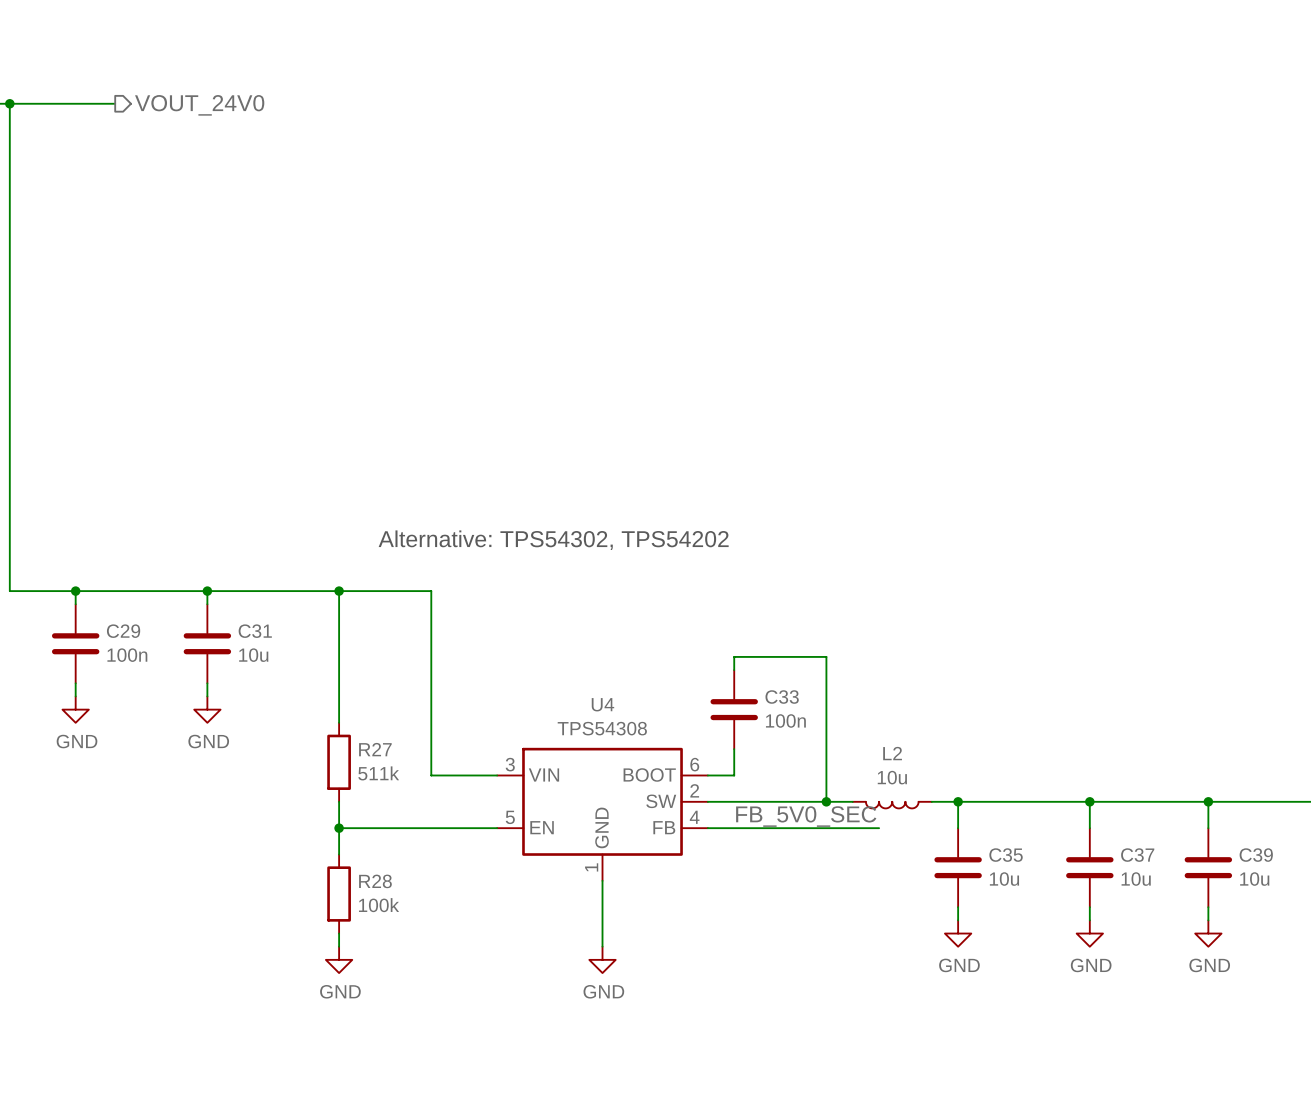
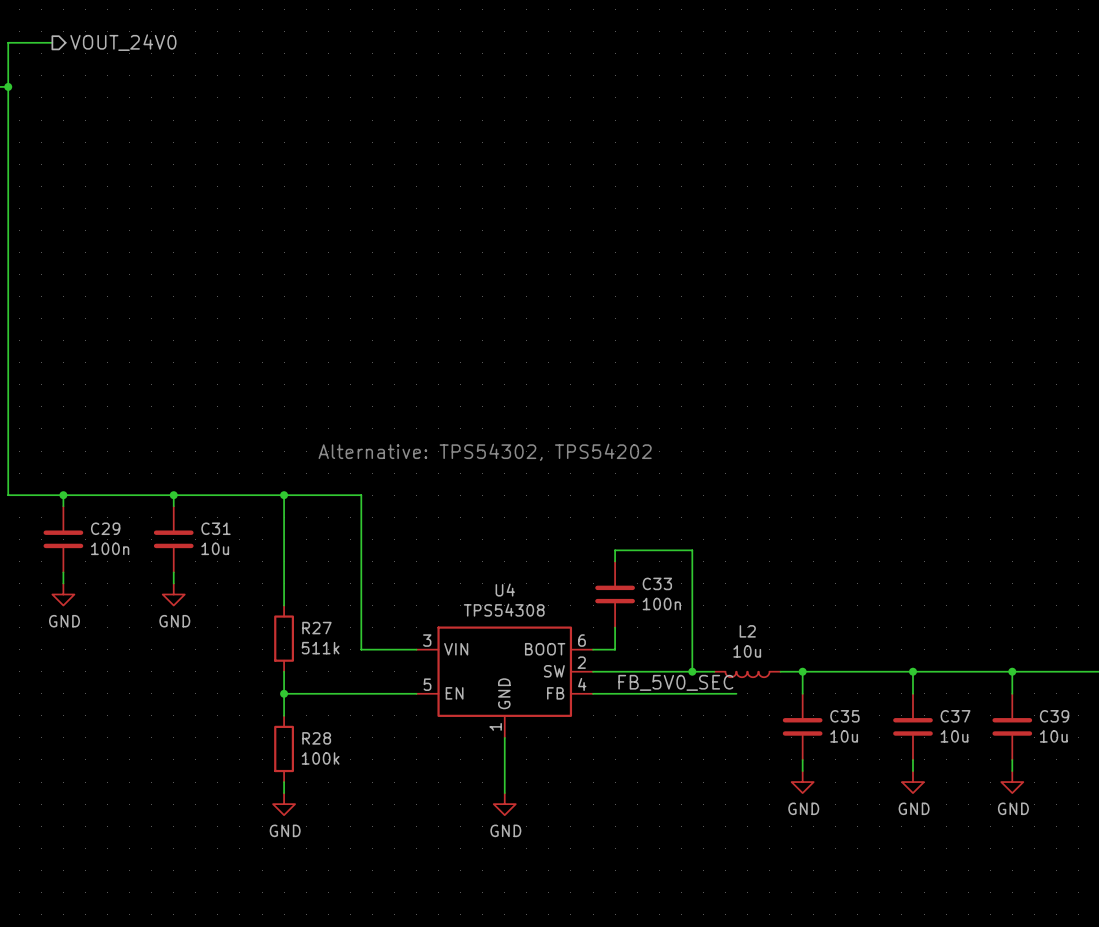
wire: (9, 103) (115, 103) -> (8, 86) (8, 42) (52, 42)
hierarchical label position: VOUT_24V0 (199, 105) -> VOUT_24V0 (123, 42)

